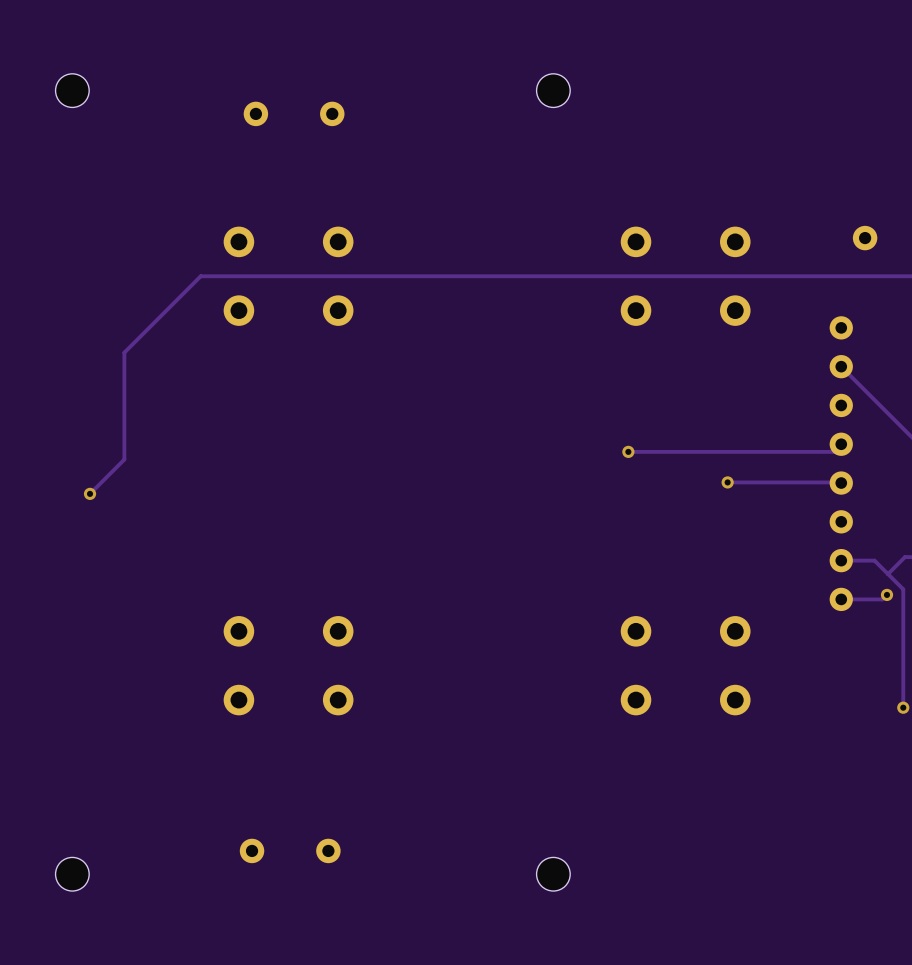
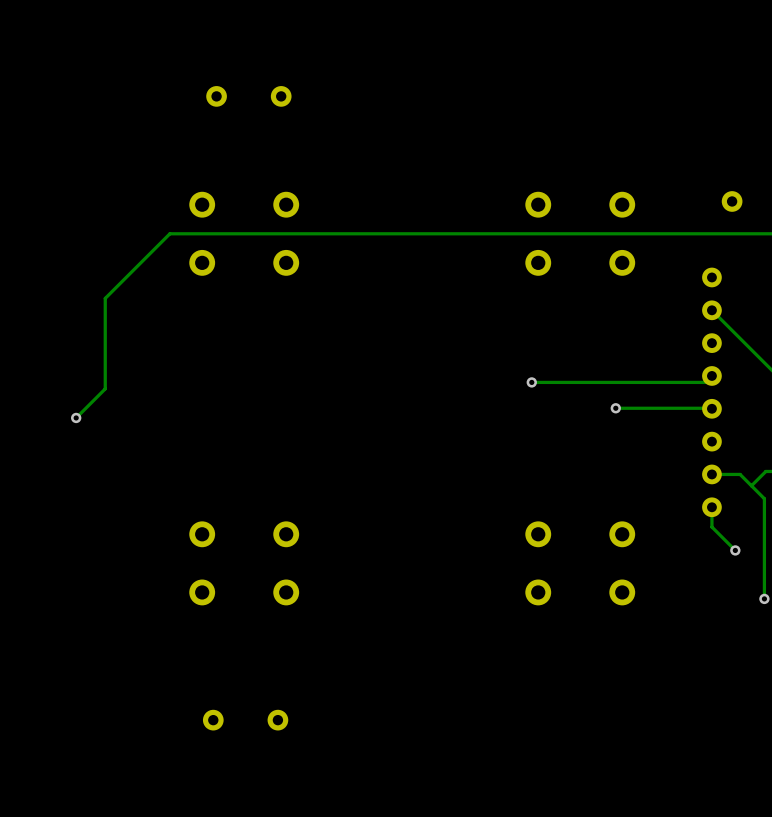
part: (72, 90) -> none
part: (553, 90) -> none
track: (886, 594) (882, 599) (841, 599) -> (735, 550) (711, 527) (711, 507)
via: (886, 594) -> none
via: none -> (735, 550)
part: (72, 874) -> none
part: (553, 874) -> none

